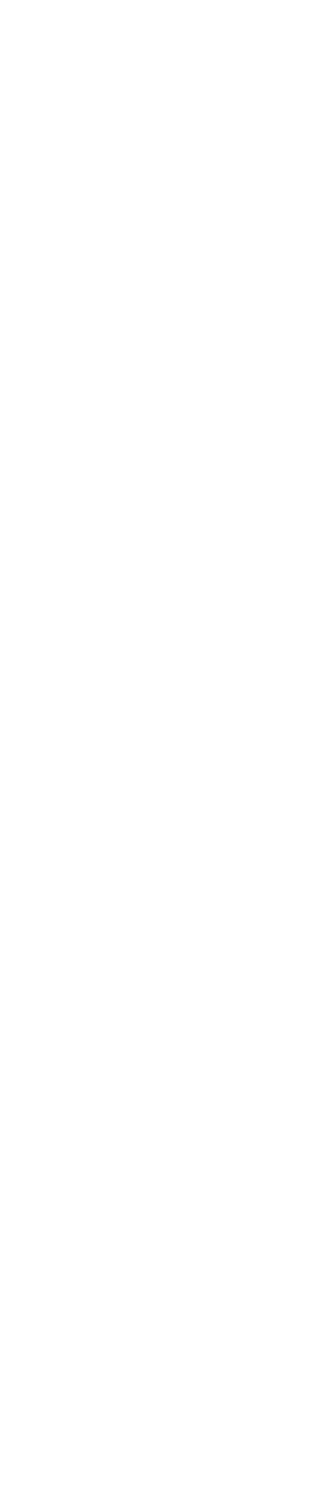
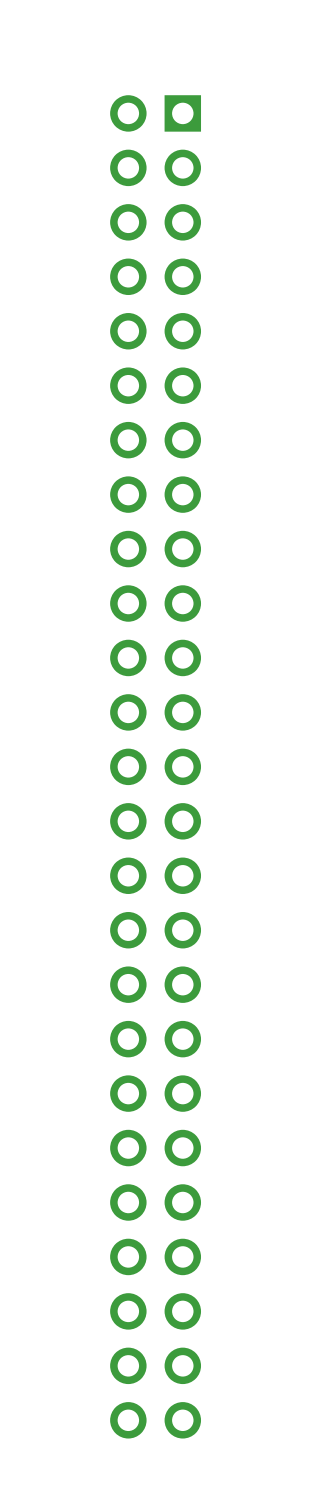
part: none -> (155, 766)

